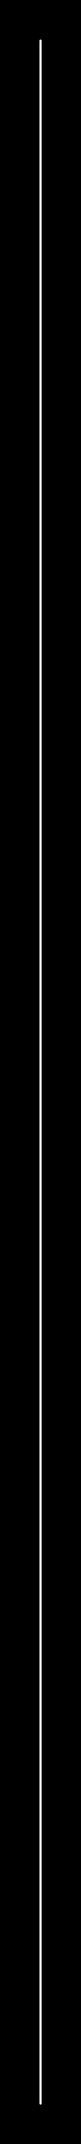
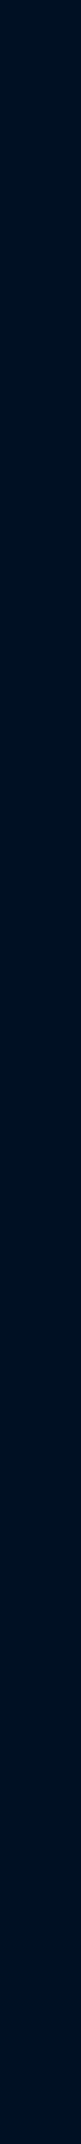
board edge: (40, 40) (40, 2103) -> none

